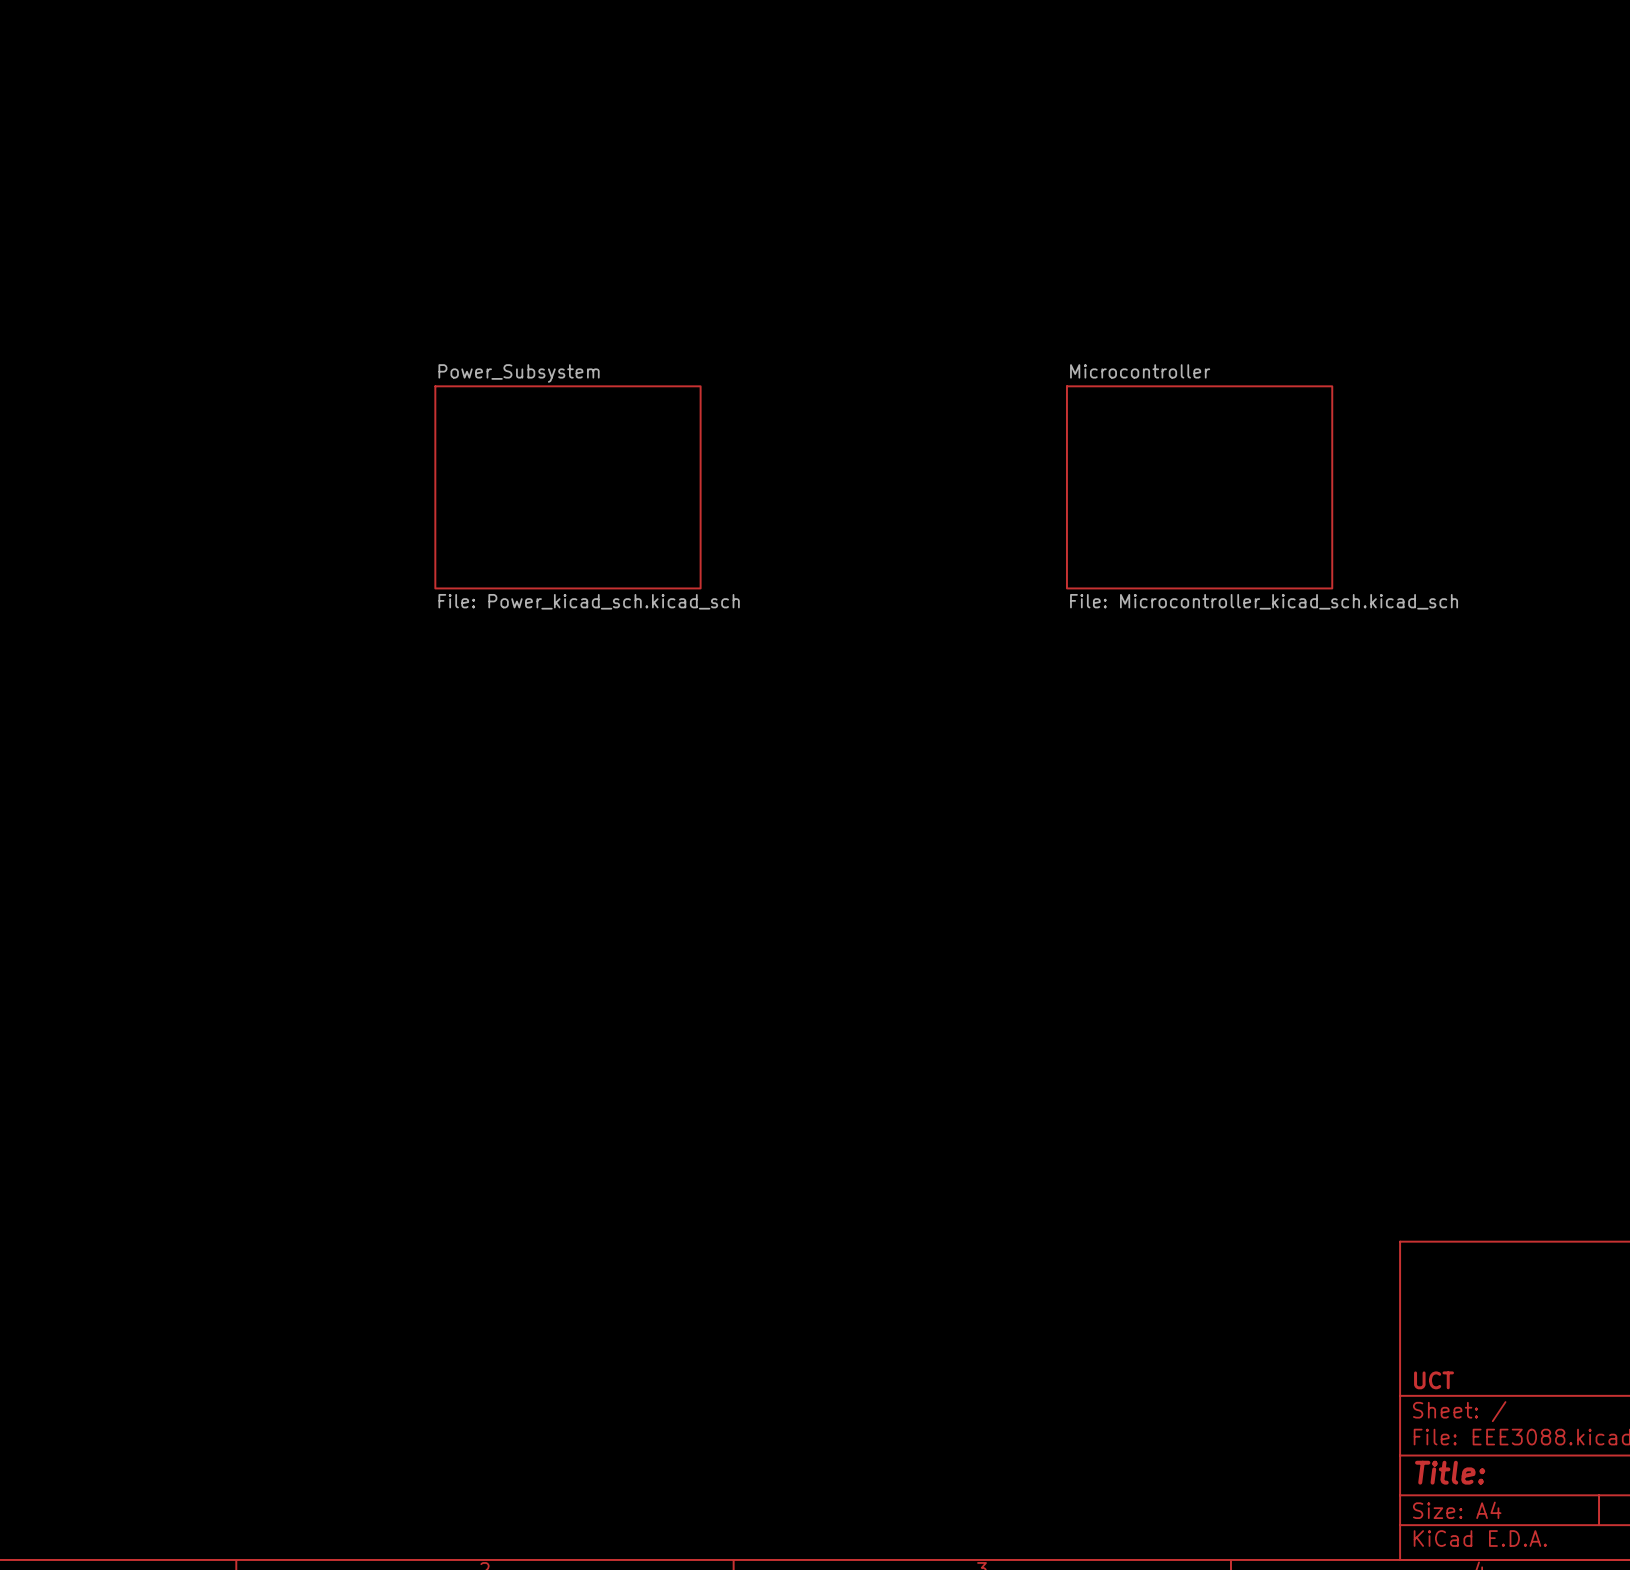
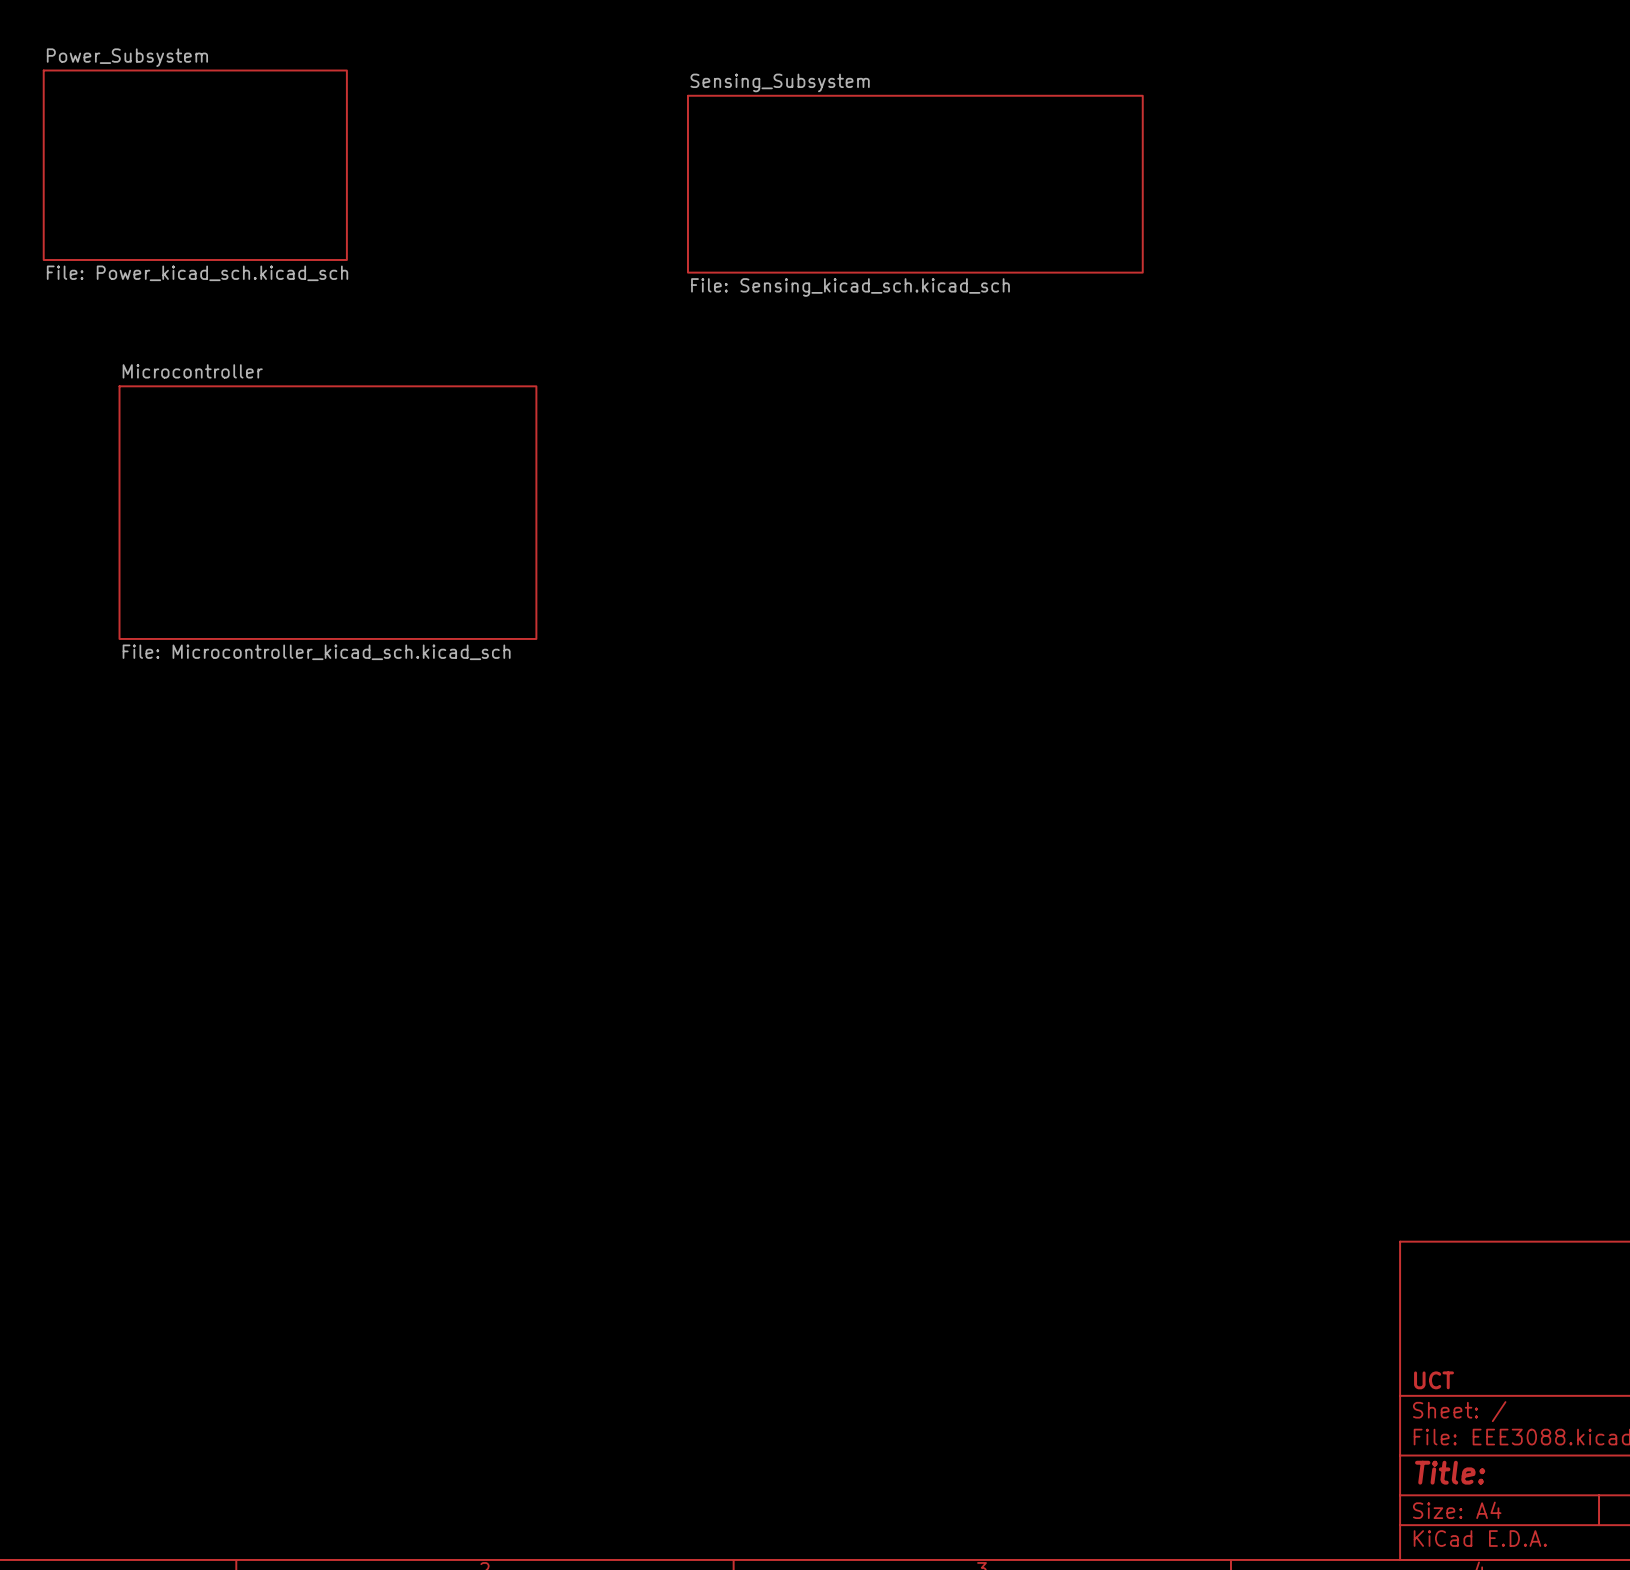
sheet Power_Subsystem: none -> File: Power_kicad_sch.kicad_sch (195, 165)
sheet Sensing_Subsystem: none -> File: Sensing_kicad_sch.kicad_sch (915, 184)
sheet Power_Subsystem: File: Power_kicad_sch.kicad_sch (567, 487) -> none
sheet Microcontroller: File: Microcontroller_kicad_sch.kicad_sch (1199, 487) -> none
sheet Microcontroller: none -> File: Microcontroller_kicad_sch.kicad_sch (327, 512)

